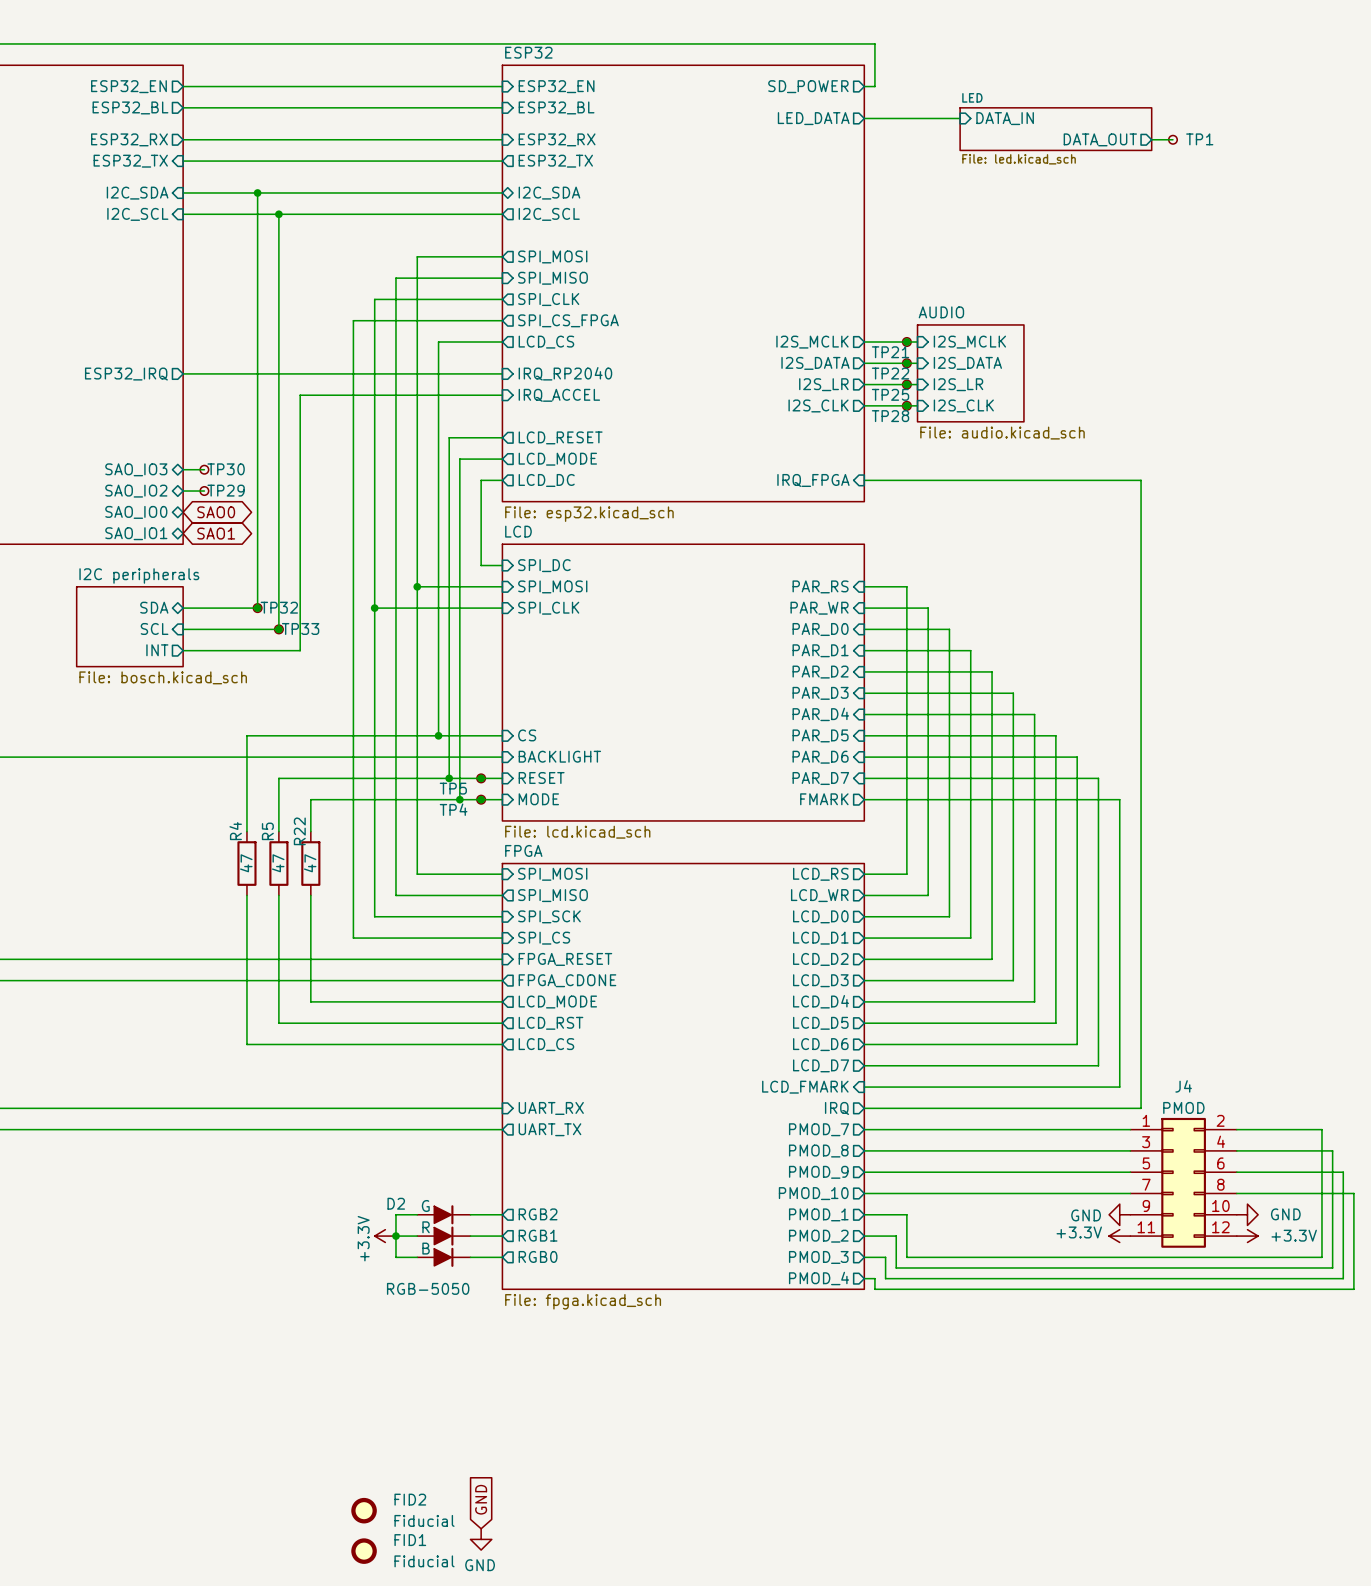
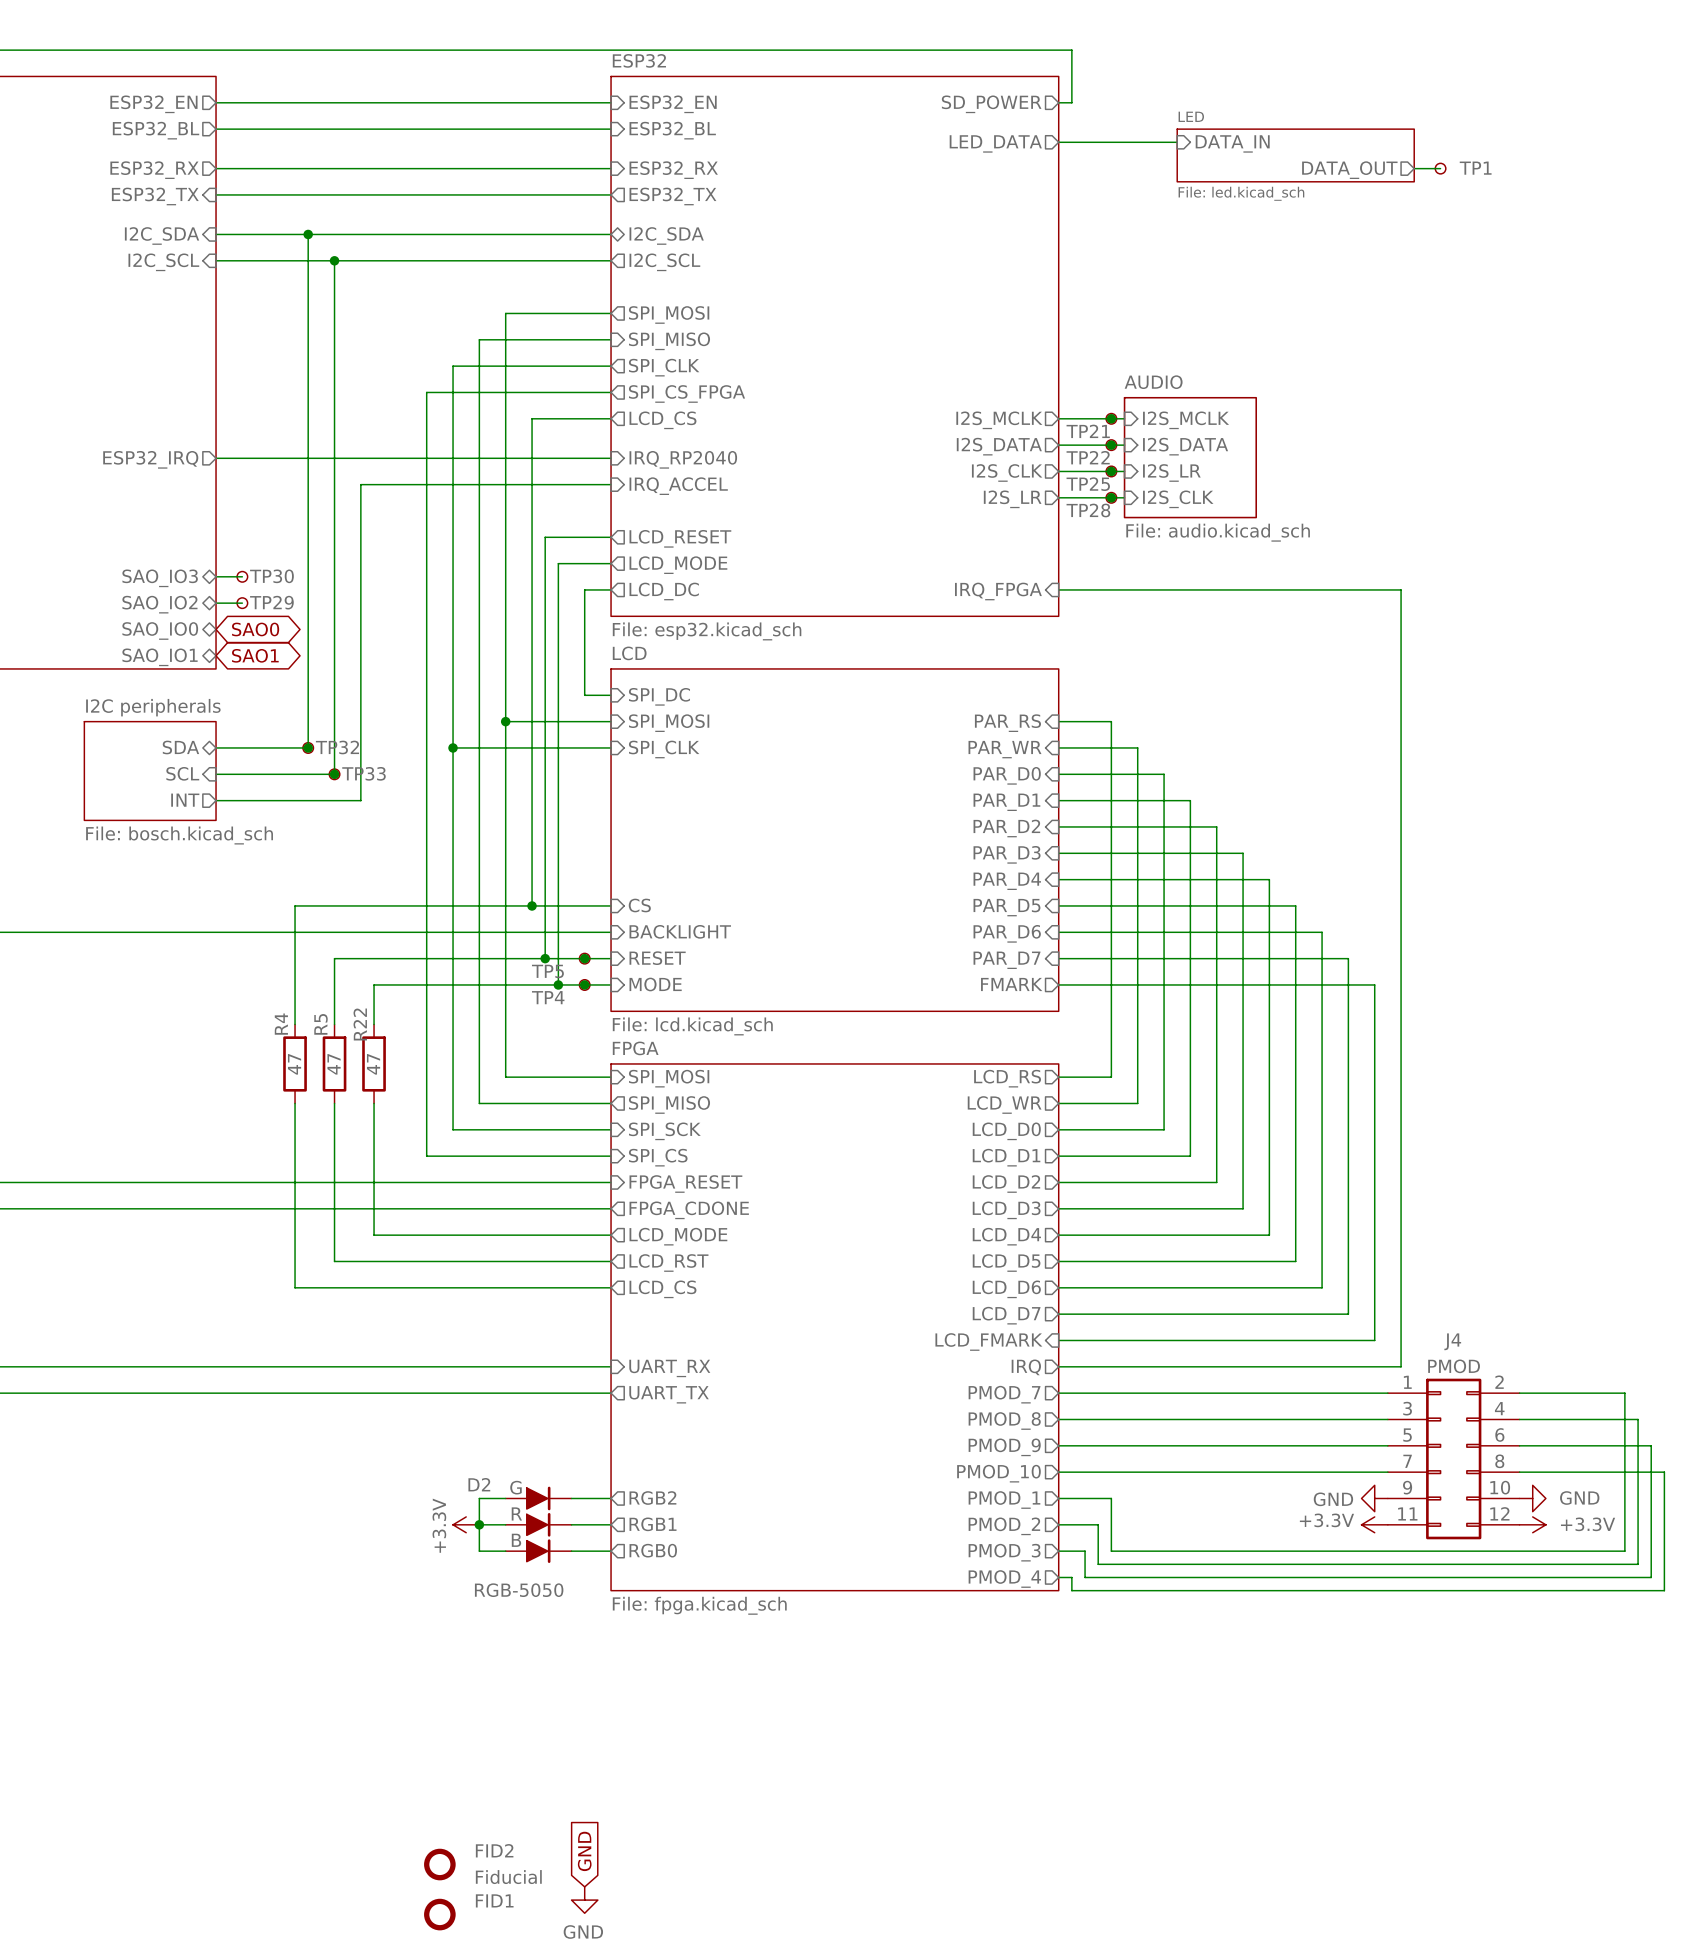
sheet pin: I2S_LR (823, 384) -> I2S_CLK (1007, 472)
sheet pin: I2S_CLK (818, 405) -> I2S_LR (1012, 499)
FID1 value: Fiducial (424, 1561) -> none

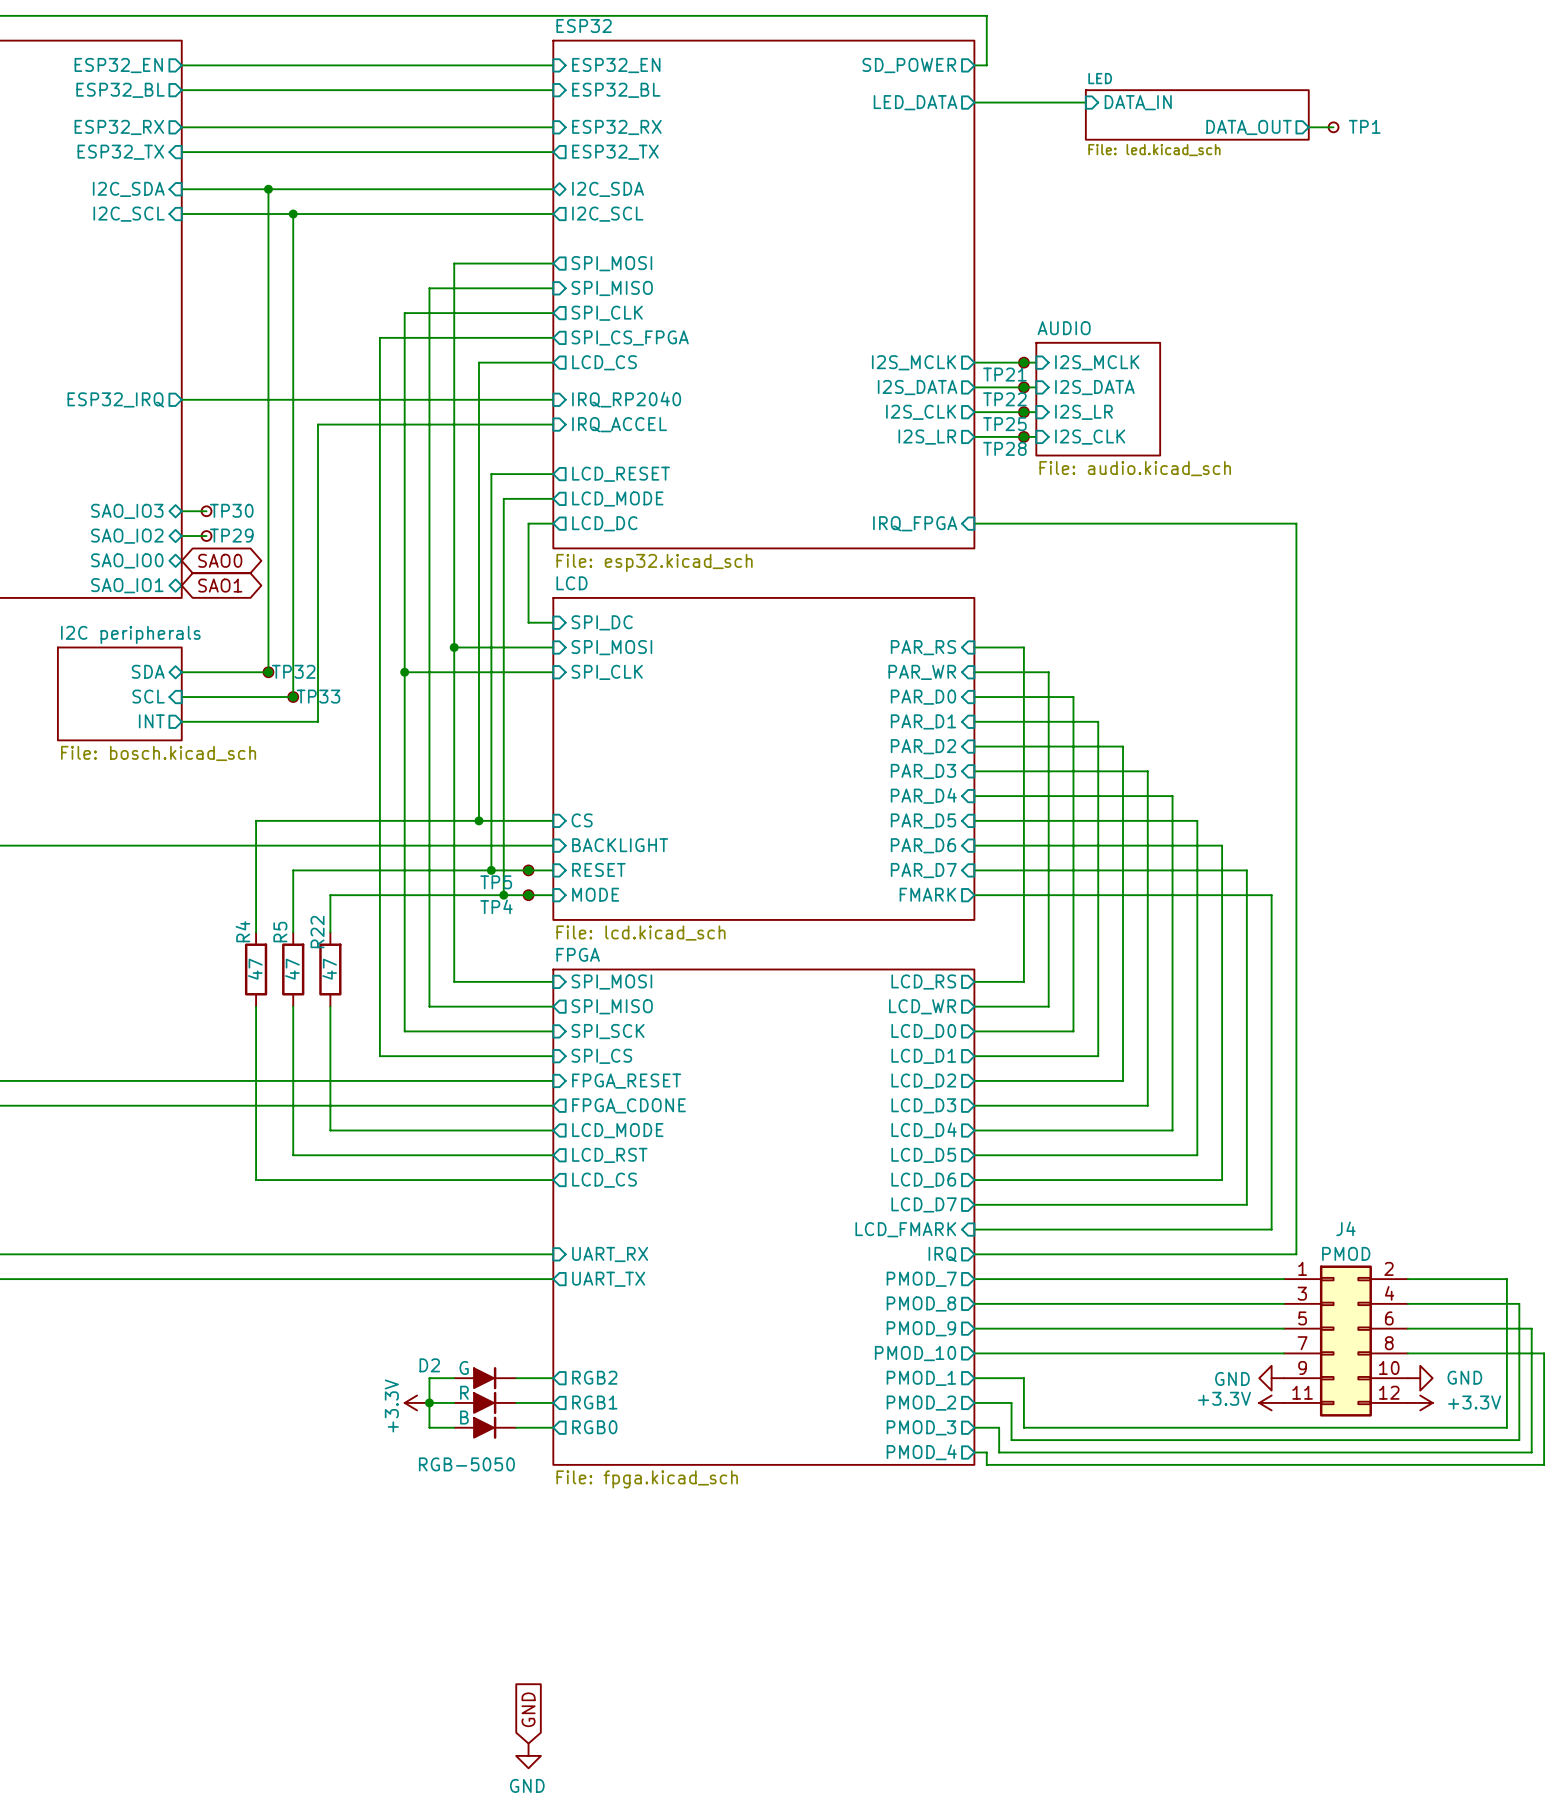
FID2: Fiducial (439, 1864) -> none
FID1: (439, 1914) -> none

